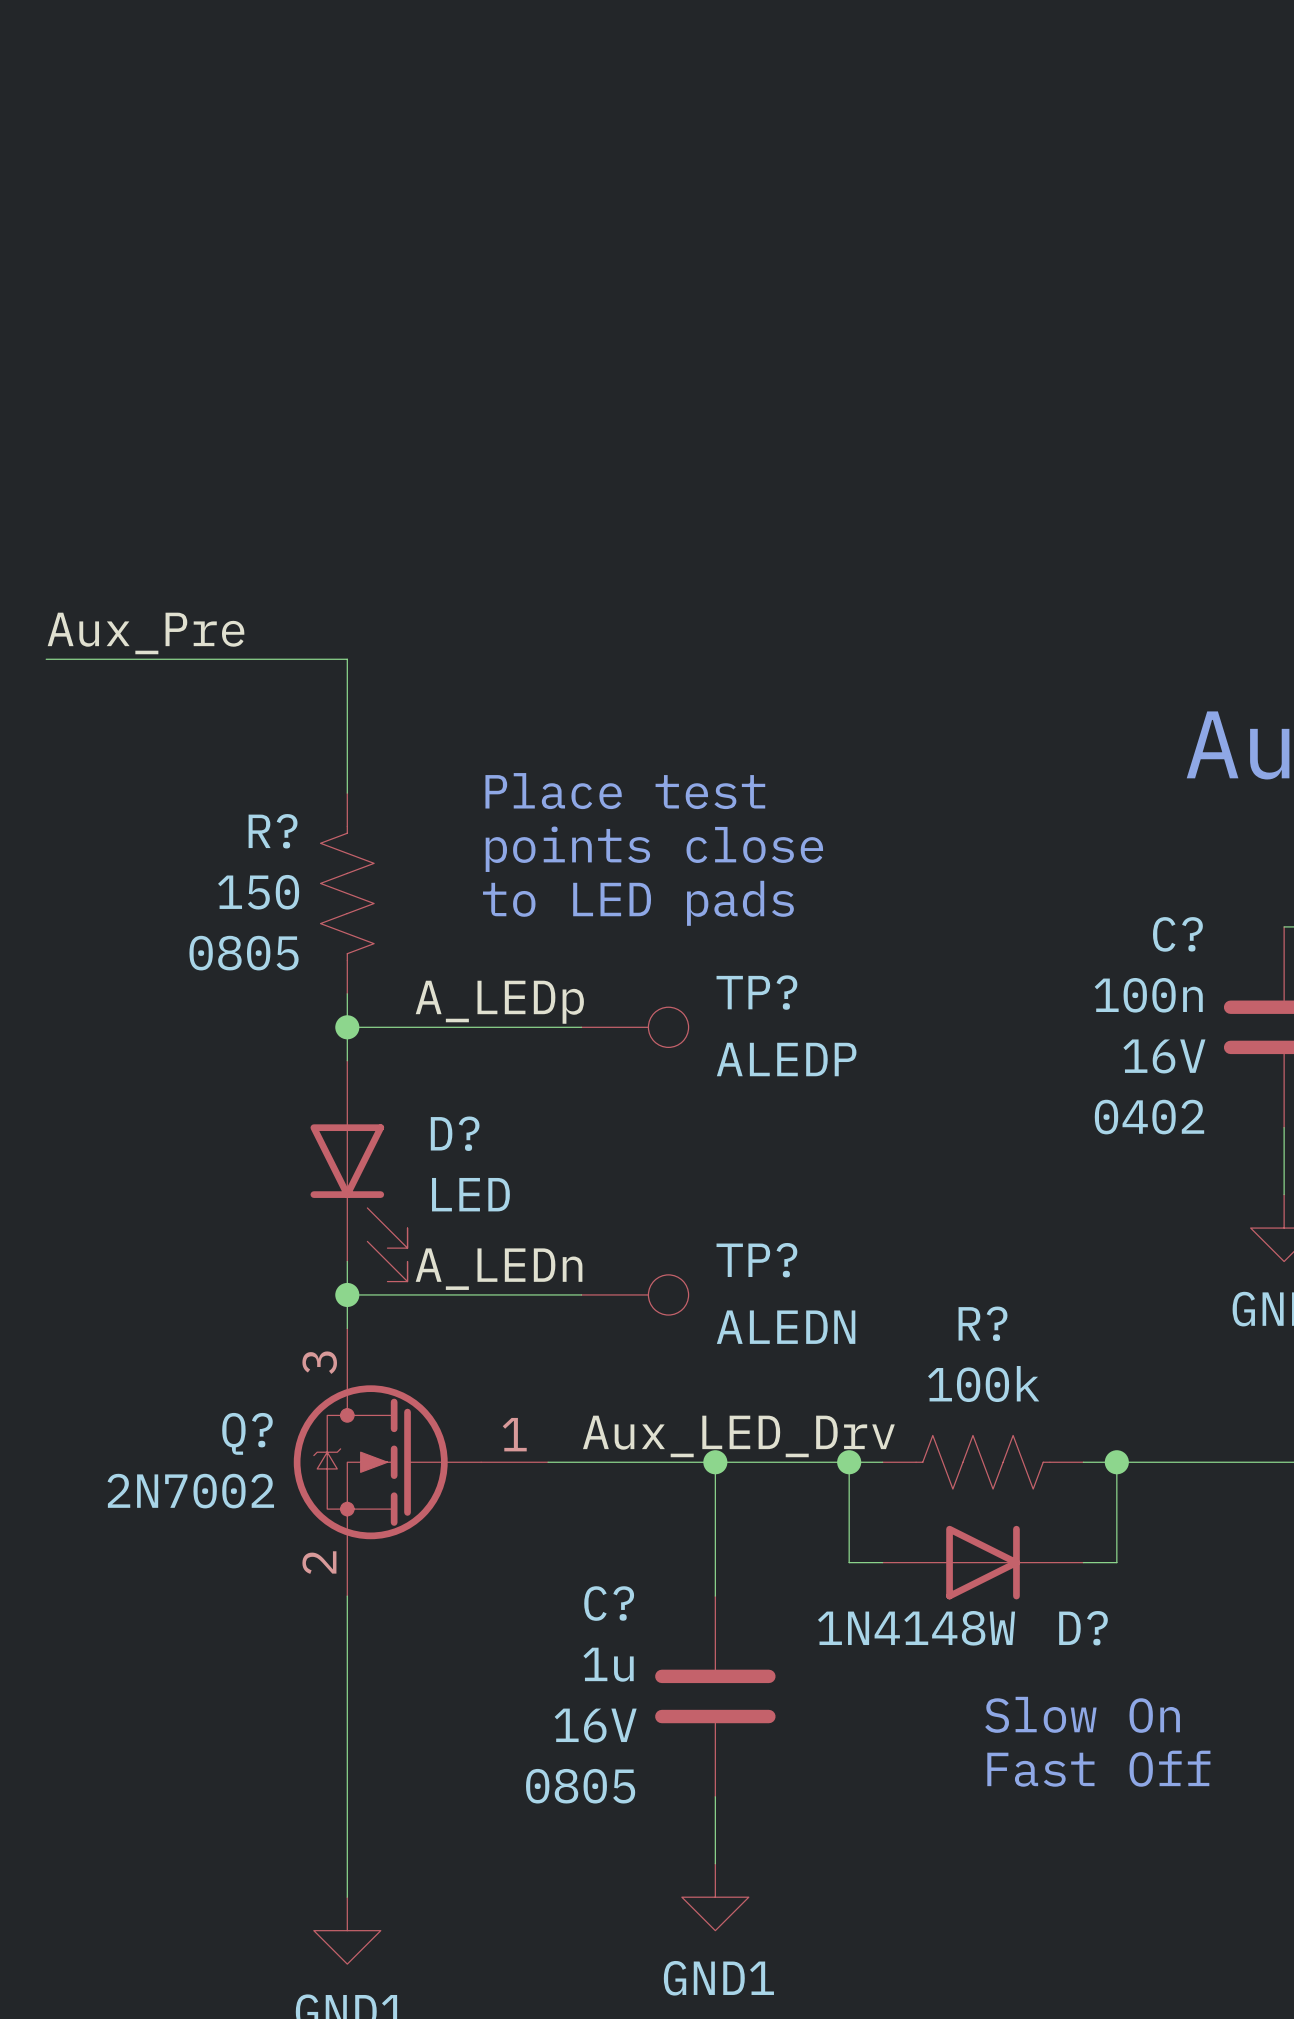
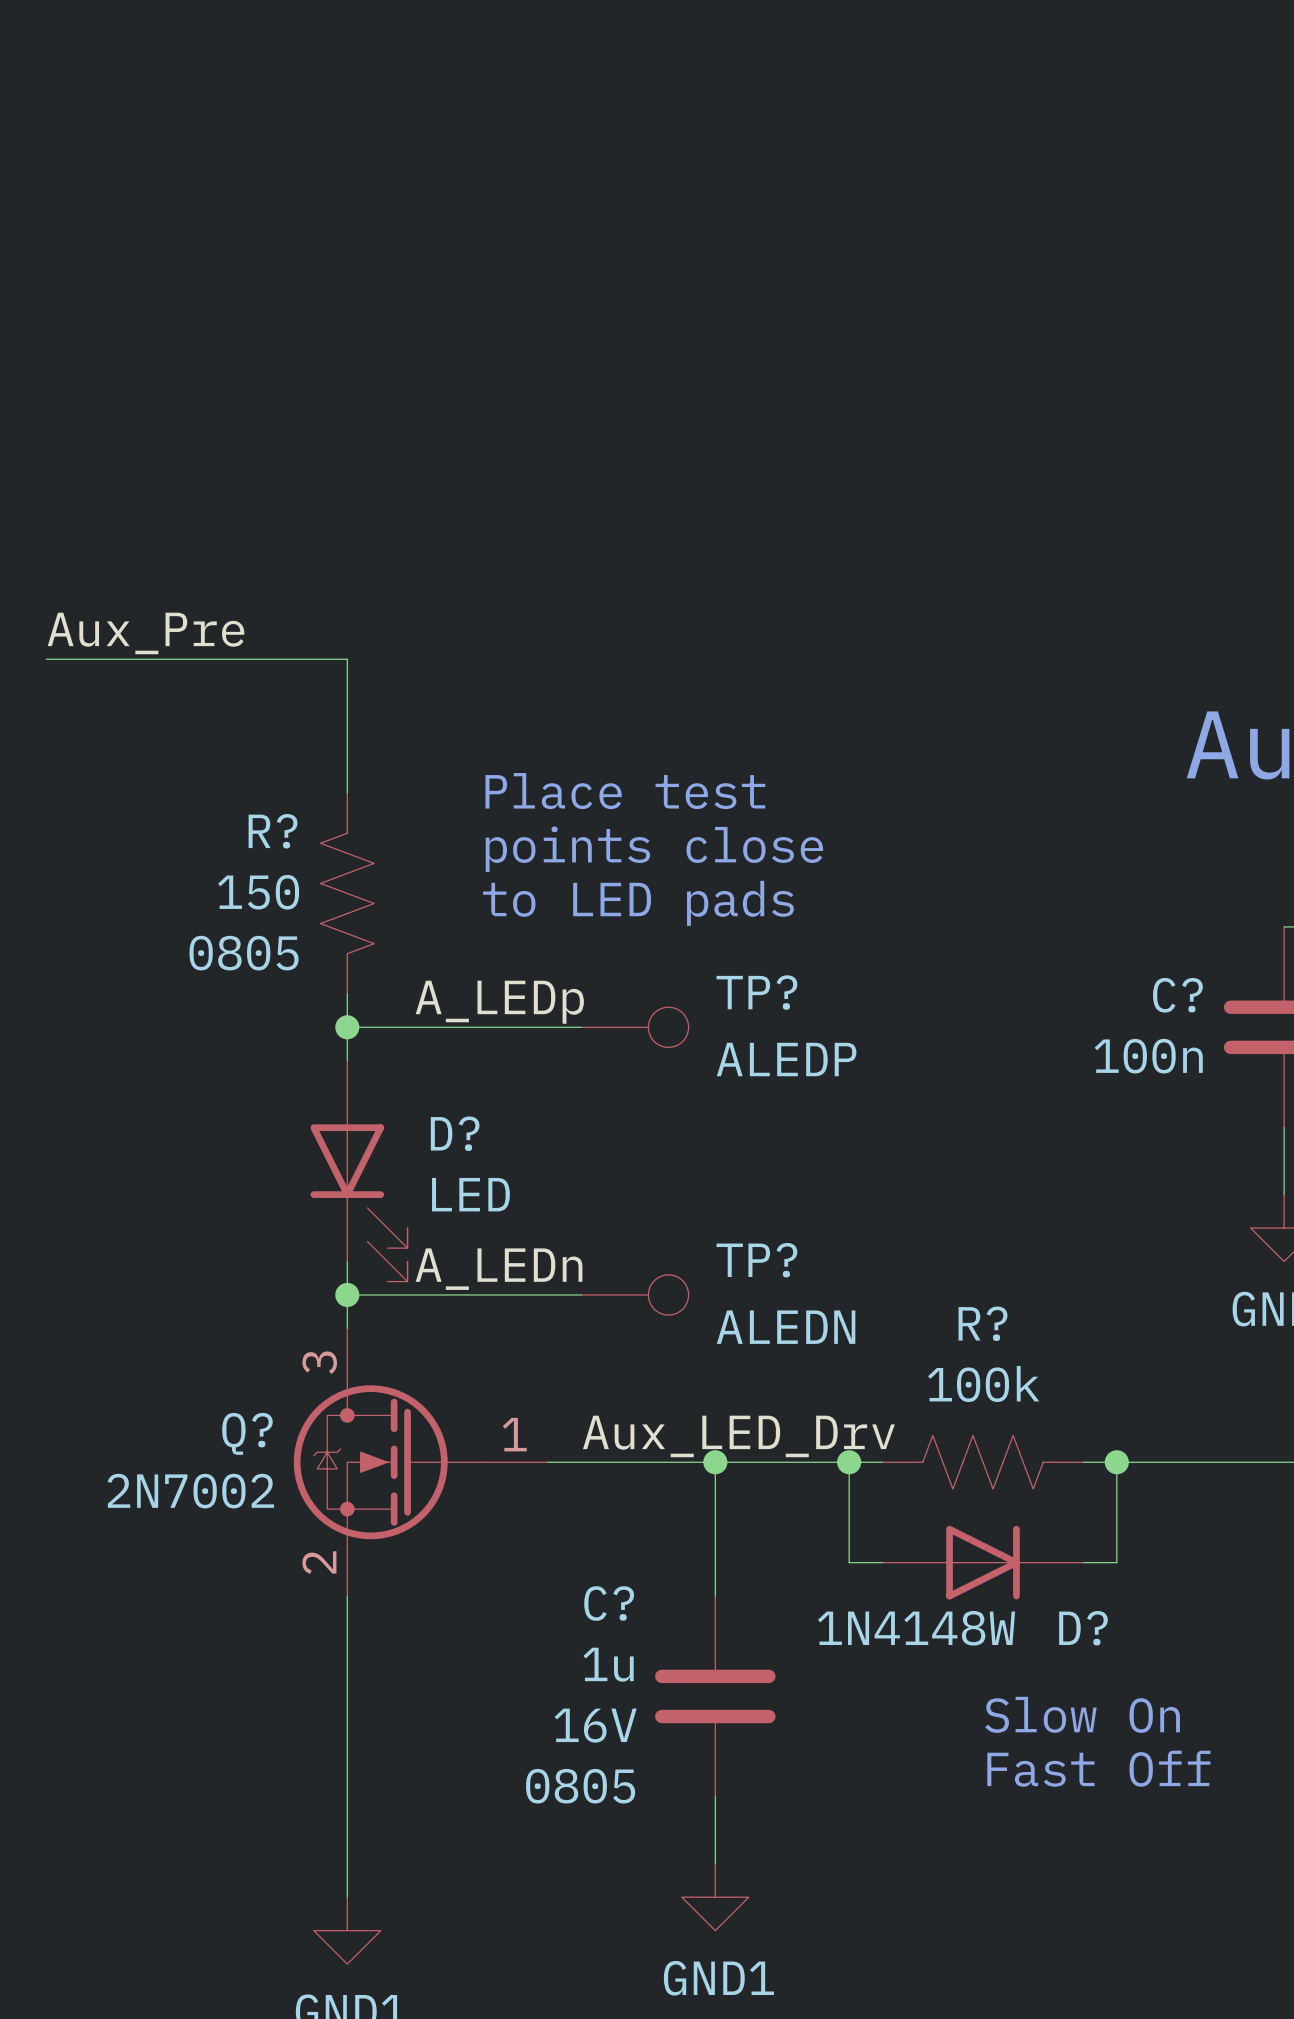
C? name position: C? (1177, 934) -> C? (1177, 995)
C? value position: 100n (1148, 995) -> 100n (1148, 1056)
C? text: 16V (1164, 1056) -> none
C? text: 0402 (1149, 1117) -> none

